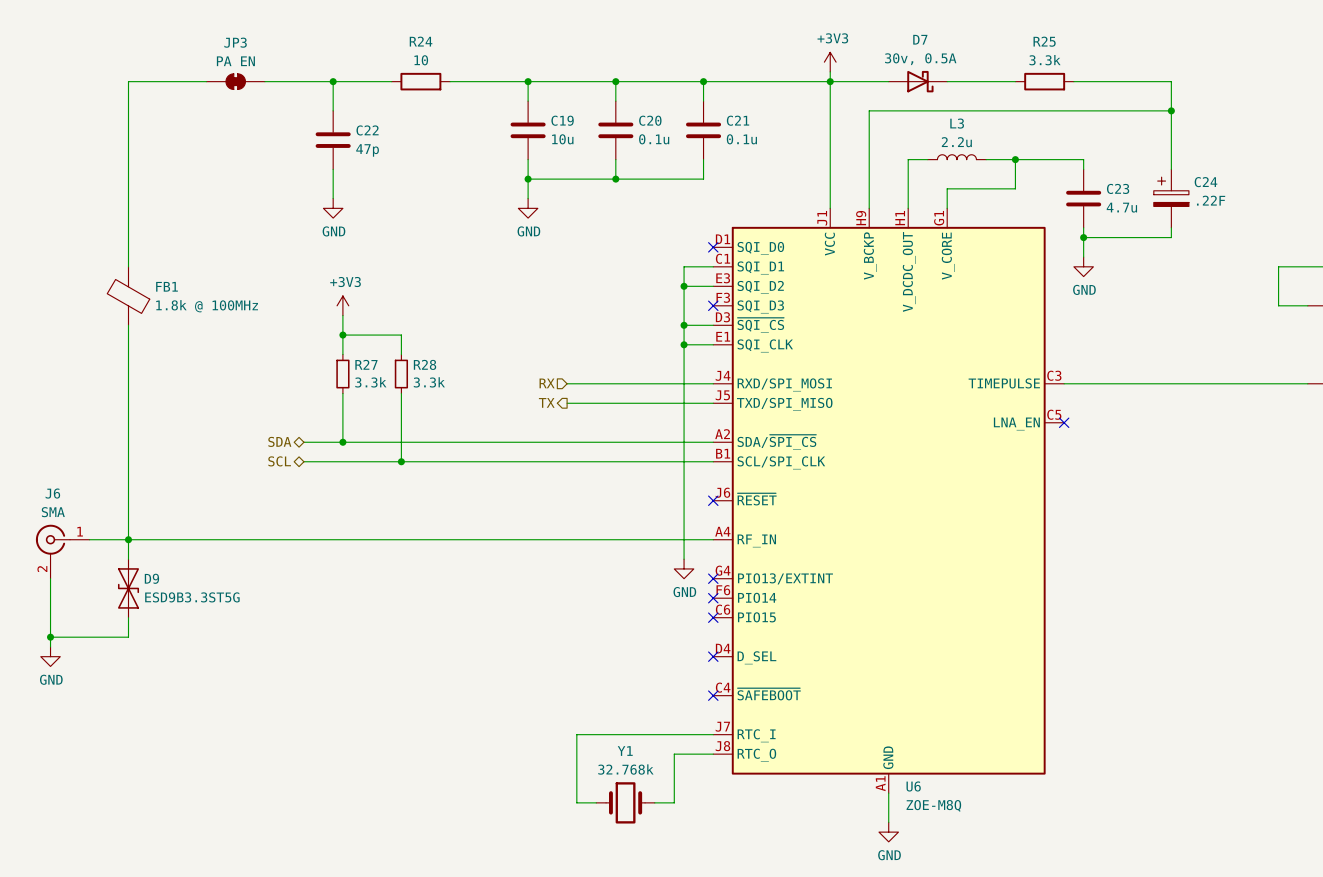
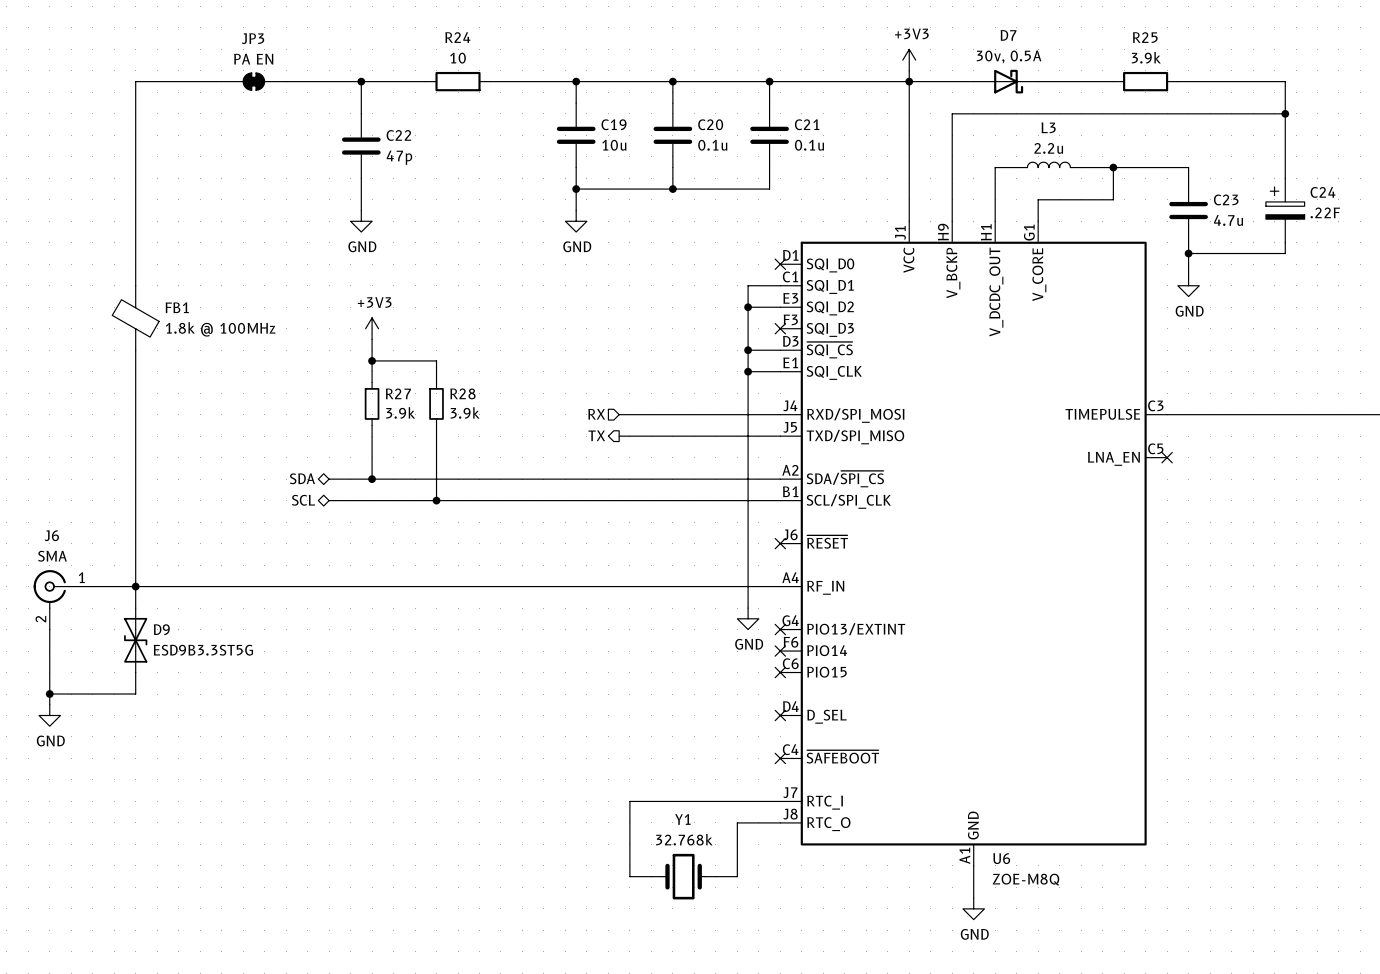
R25 value: 3.3k (1045, 60) -> 3.9k (1146, 57)
R27 value: 3.3k (370, 382) -> 3.9k (400, 412)
R28 value: 3.3k (429, 382) -> 3.9k (465, 412)

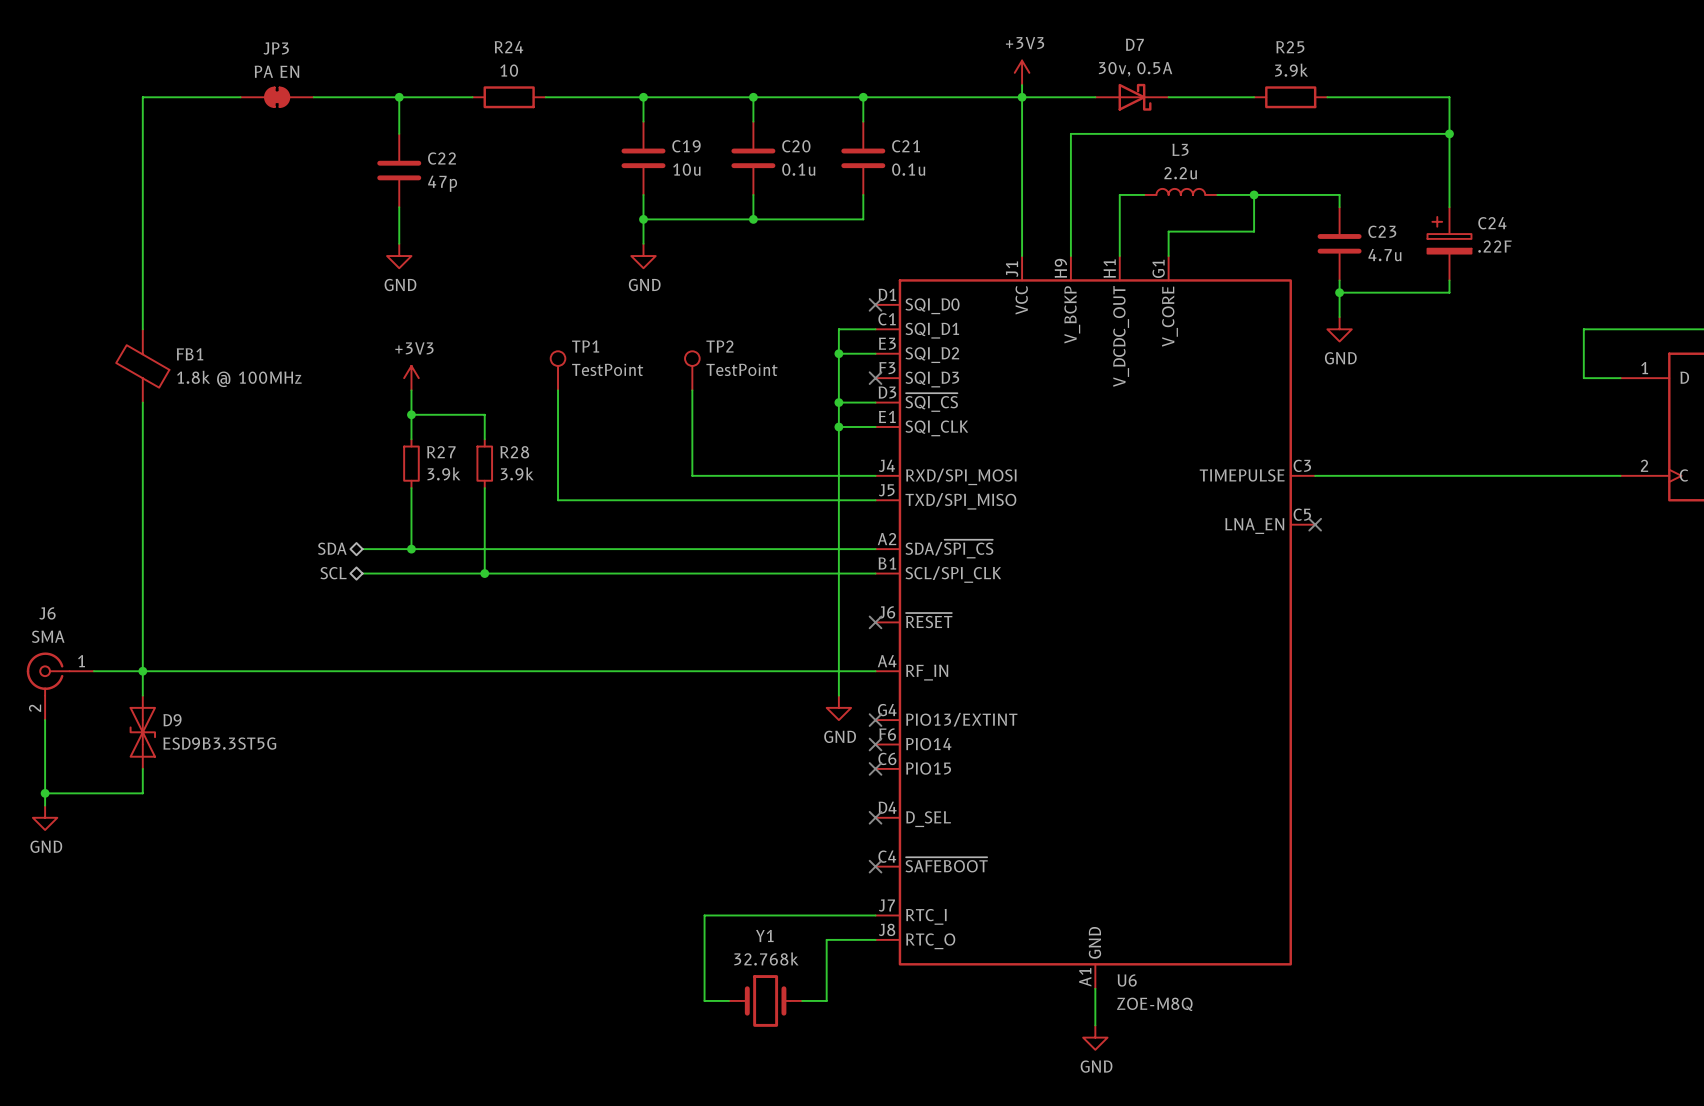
TP1: none -> TestPoint (558, 370)
TP2: none -> TestPoint (692, 370)
wire: none -> (558, 390) (558, 500) (692, 500)
wire: none -> (692, 390) (692, 475)
hierarchical label: RX (596, 414) -> none
hierarchical label: TX (596, 435) -> none

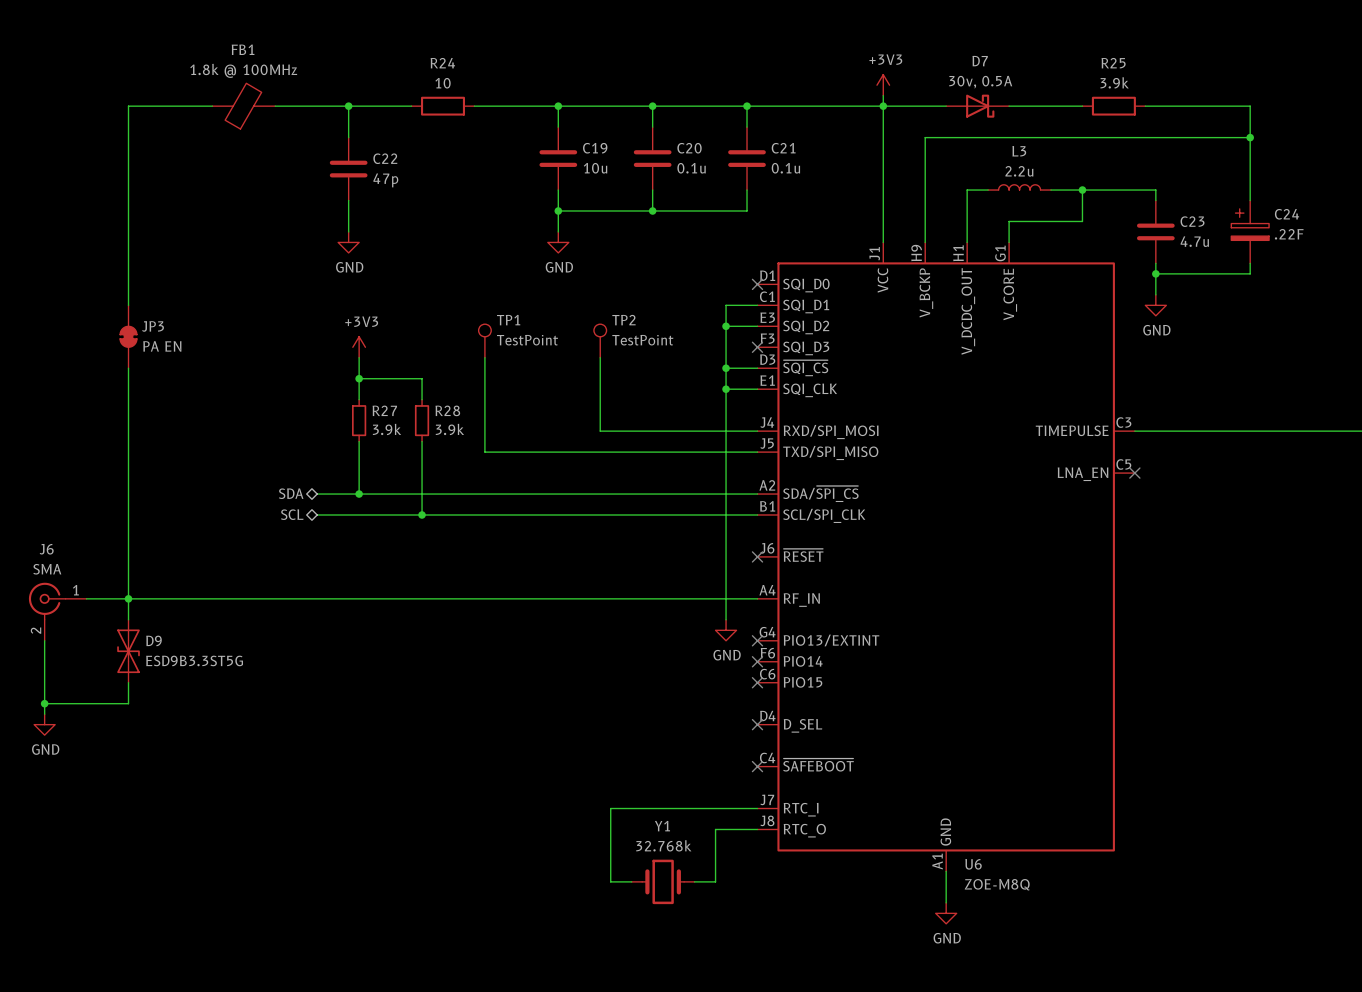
JP3 value position: PA EN (276, 71) -> PA EN (162, 346)
JP3 rotation: 0° (277, 97) -> 90° clockwise (128, 336)
JP3 position: (277, 97) -> (128, 336)
FB1 name position: FB1 (190, 354) -> FB1 (243, 49)
FB1 position: (142, 365) -> (243, 106)
FB1 rotation: 0° (142, 366) -> 90° clockwise (243, 106)
FB1 value position: 1.8k @ 100MHz (239, 378) -> 1.8k @ 100MHz (243, 70)

